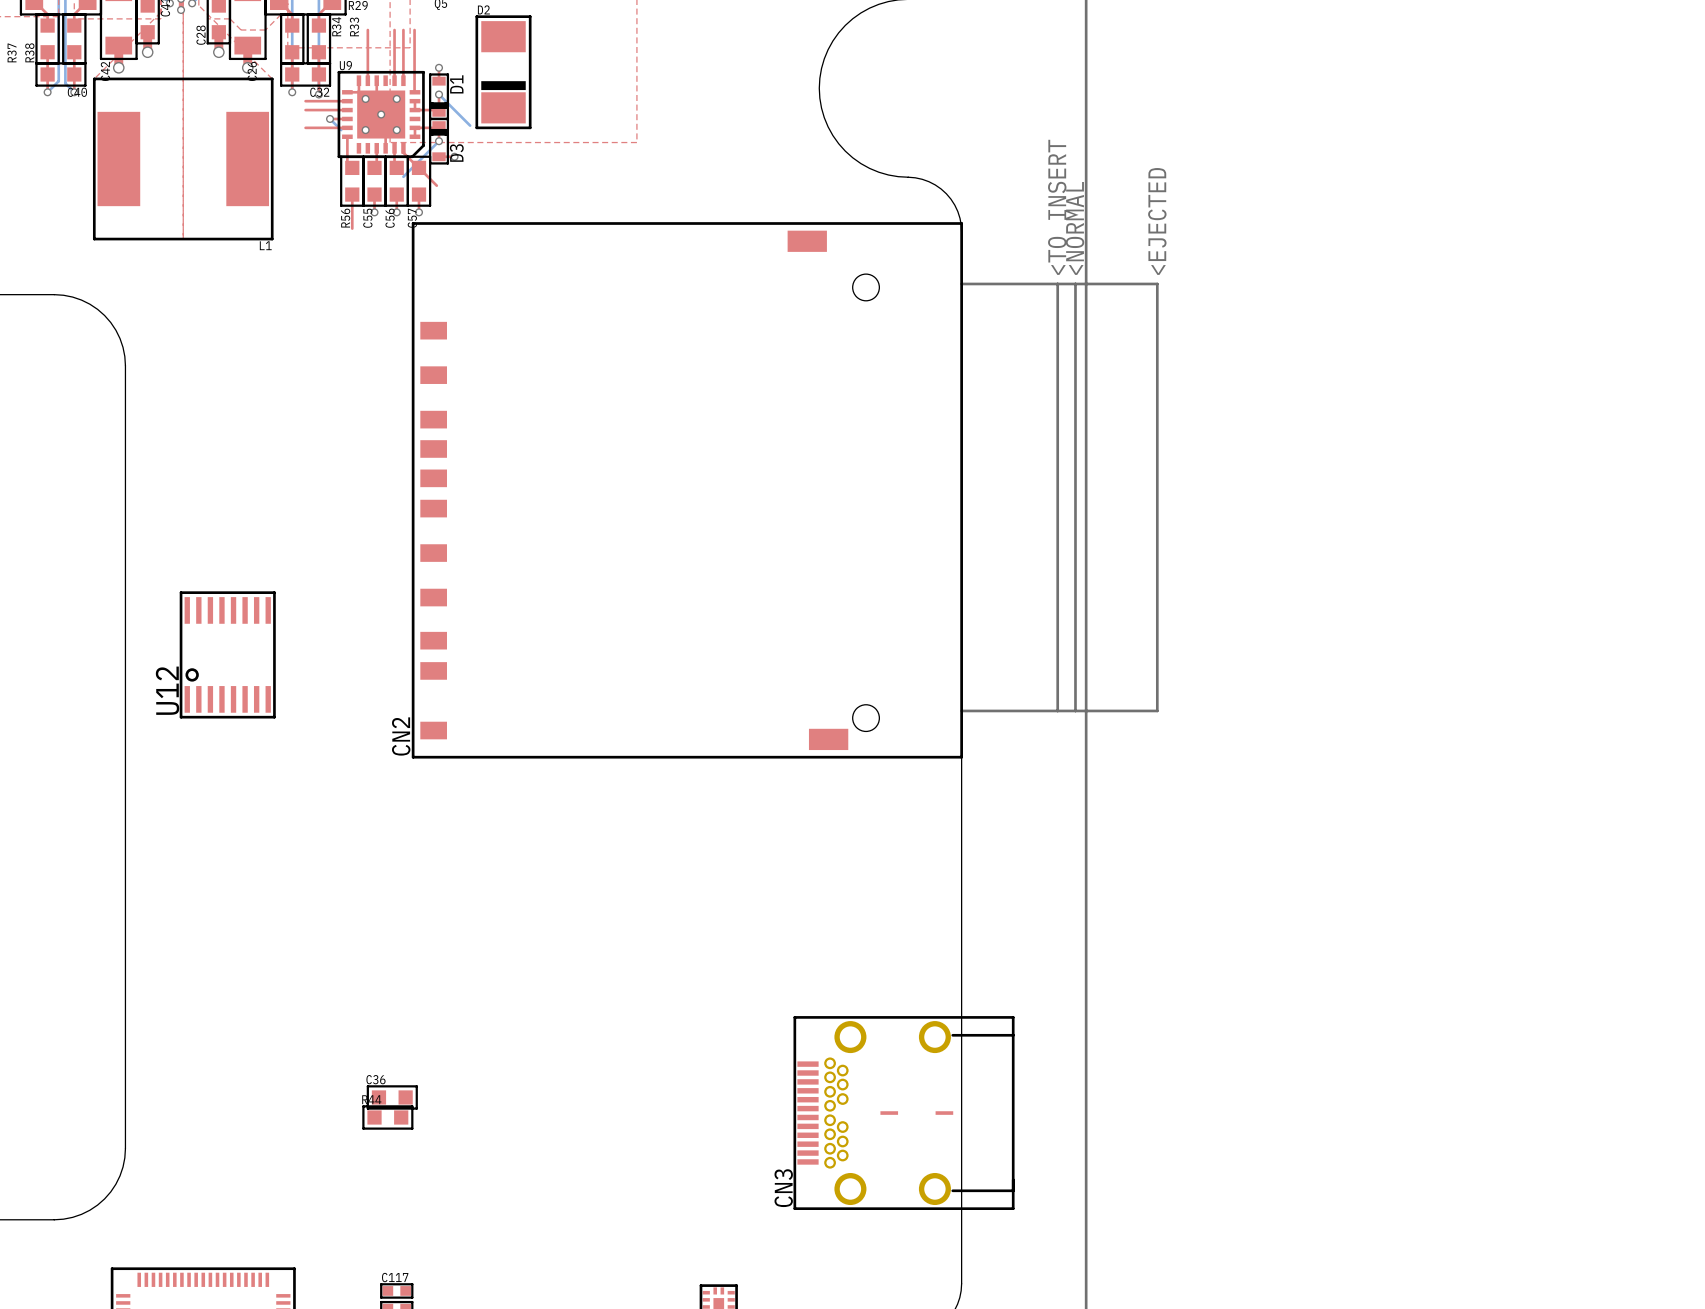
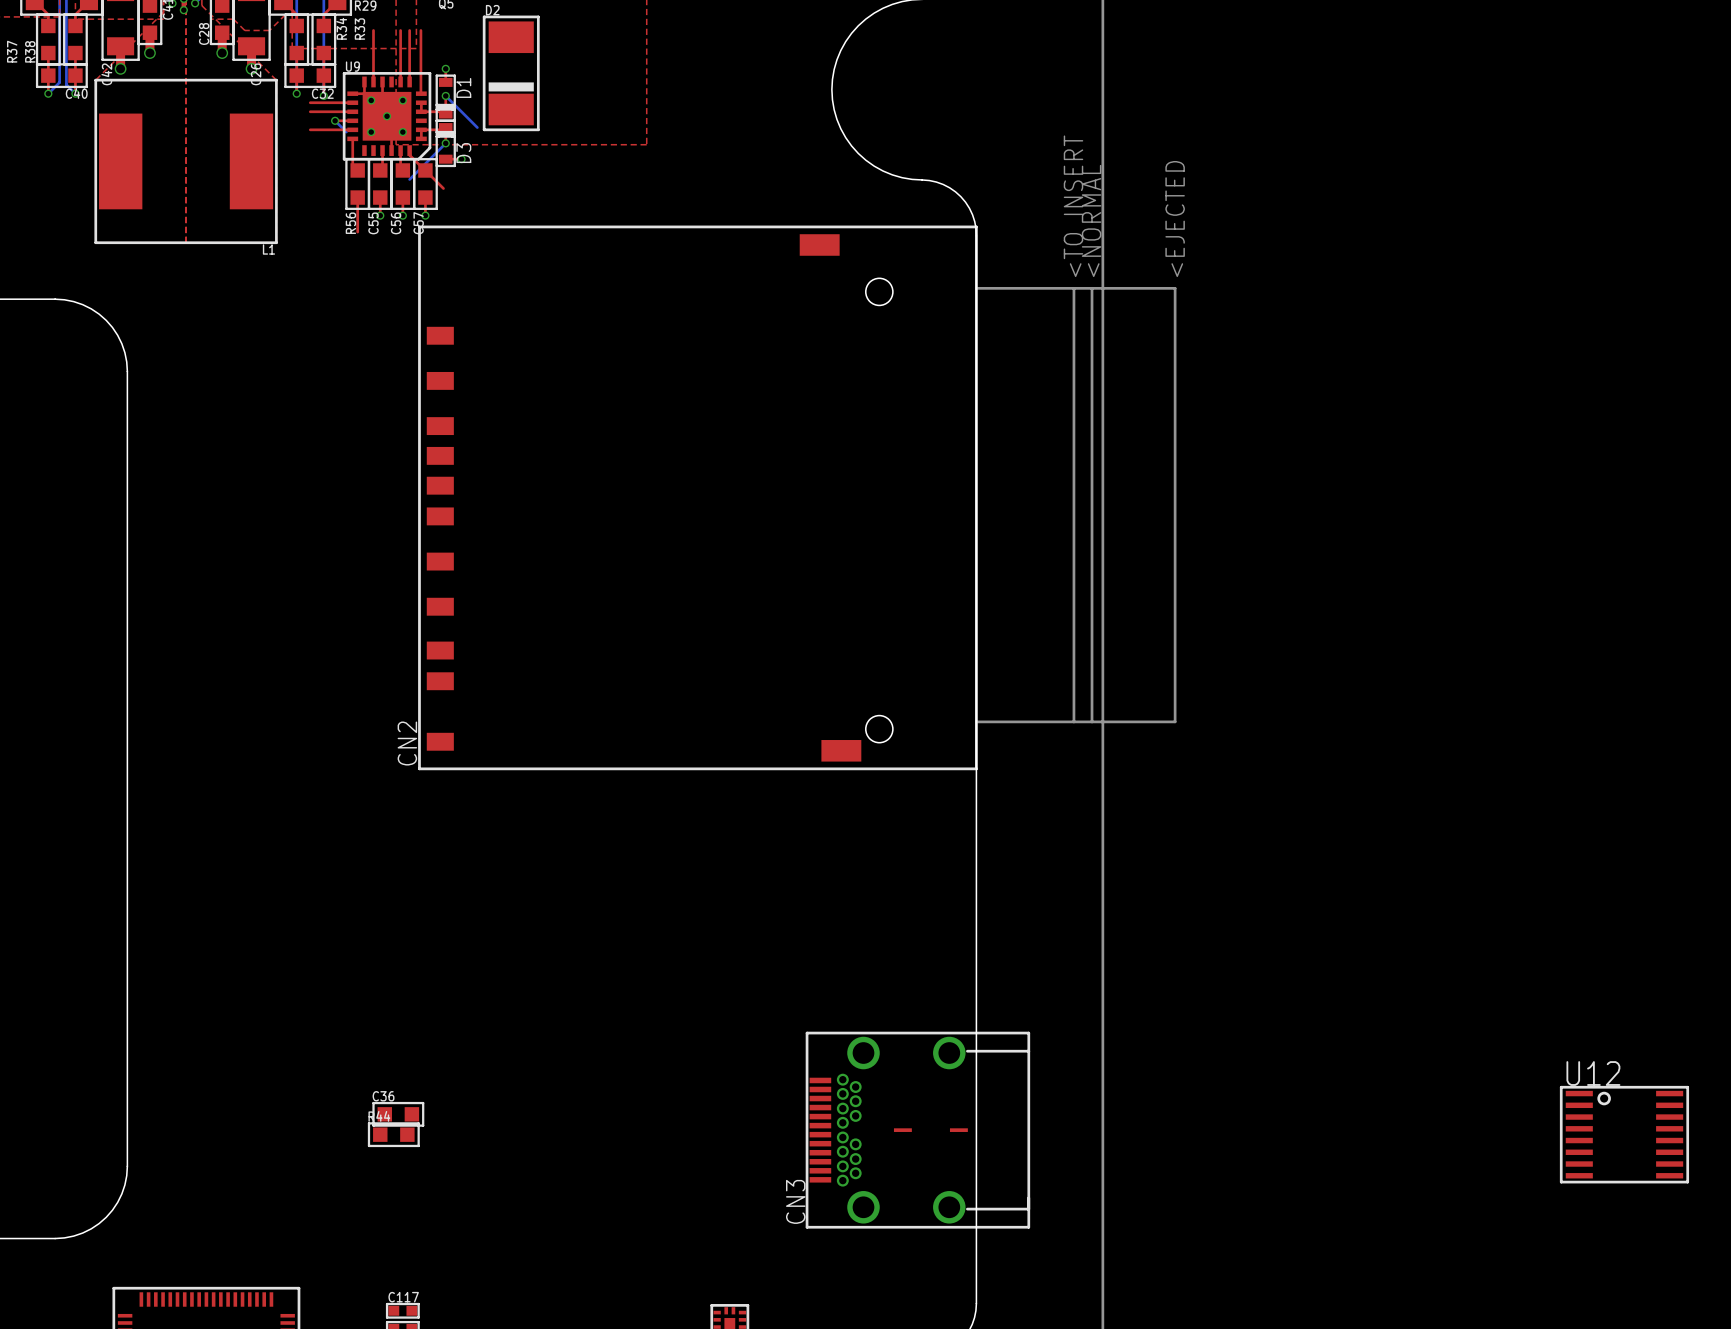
U12 rotation: 0° (227, 654) -> 90° clockwise (1624, 1134)
U12 position: (227, 654) -> (1624, 1134)

